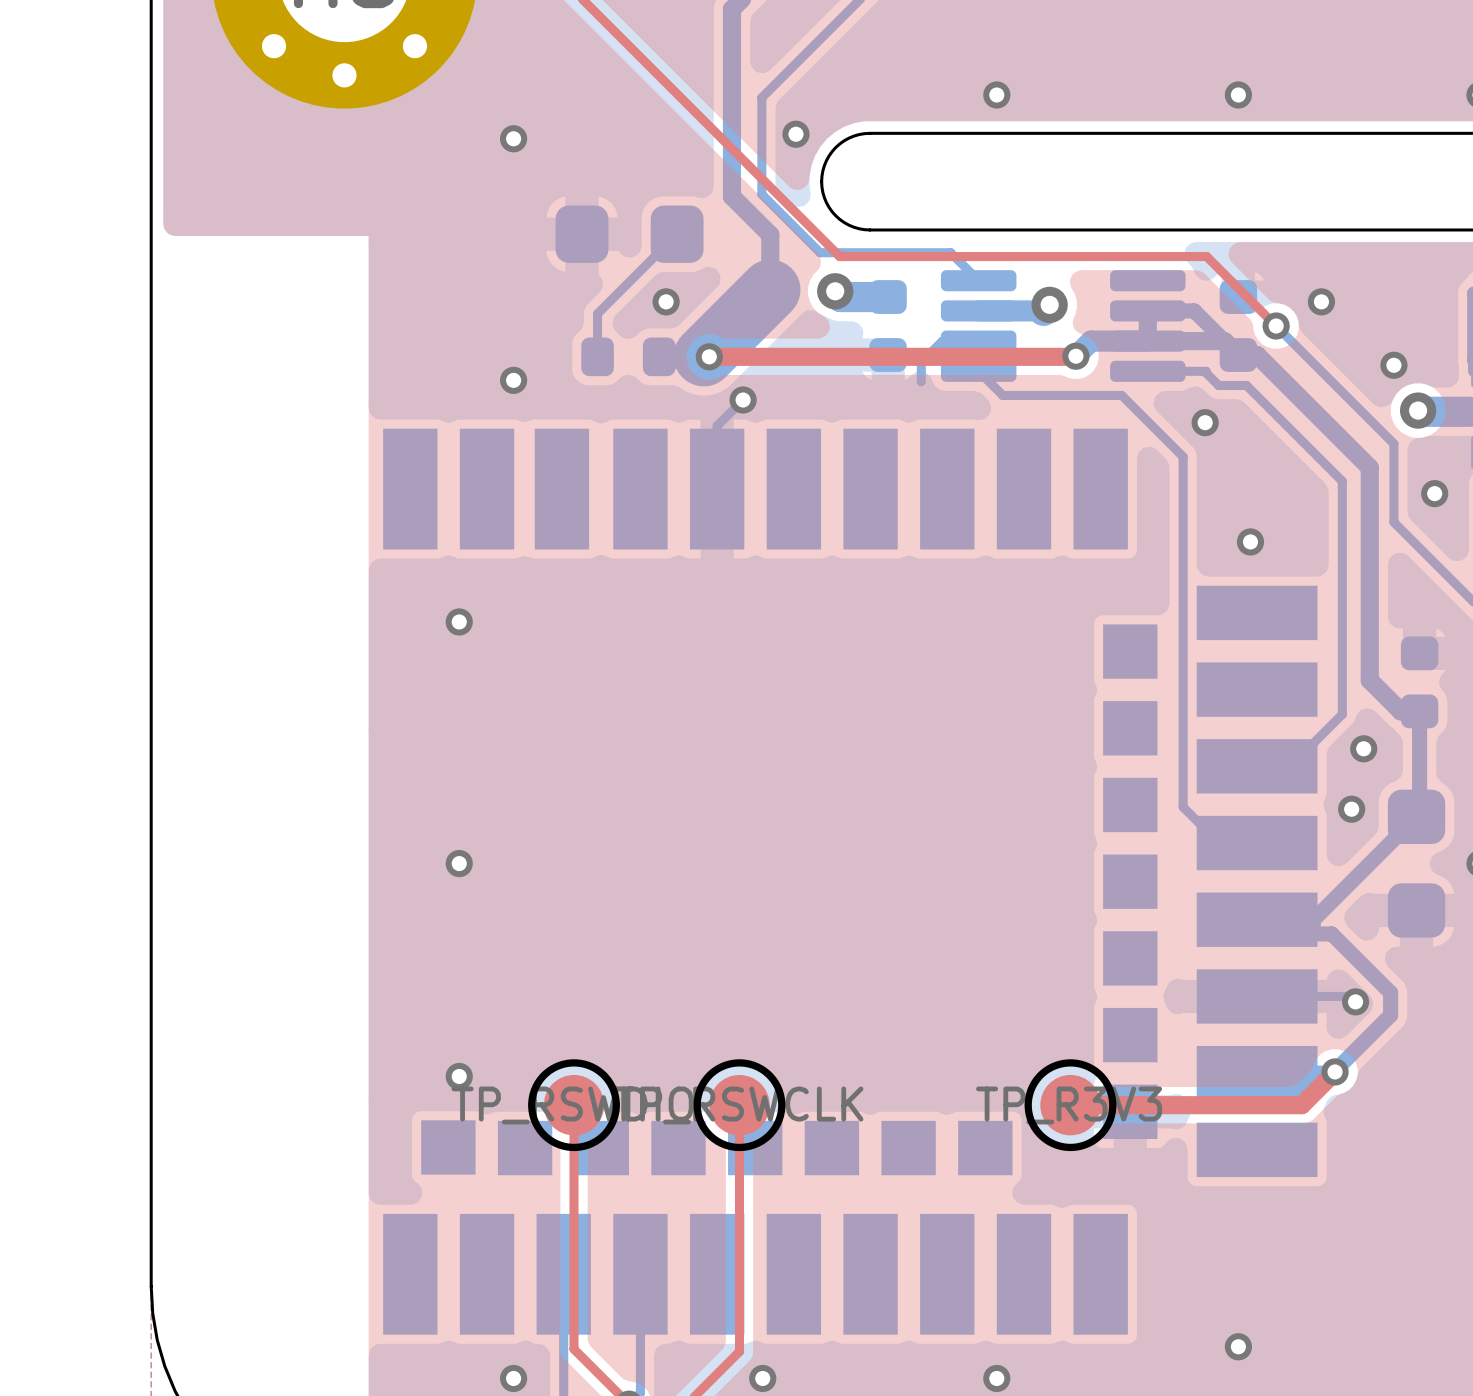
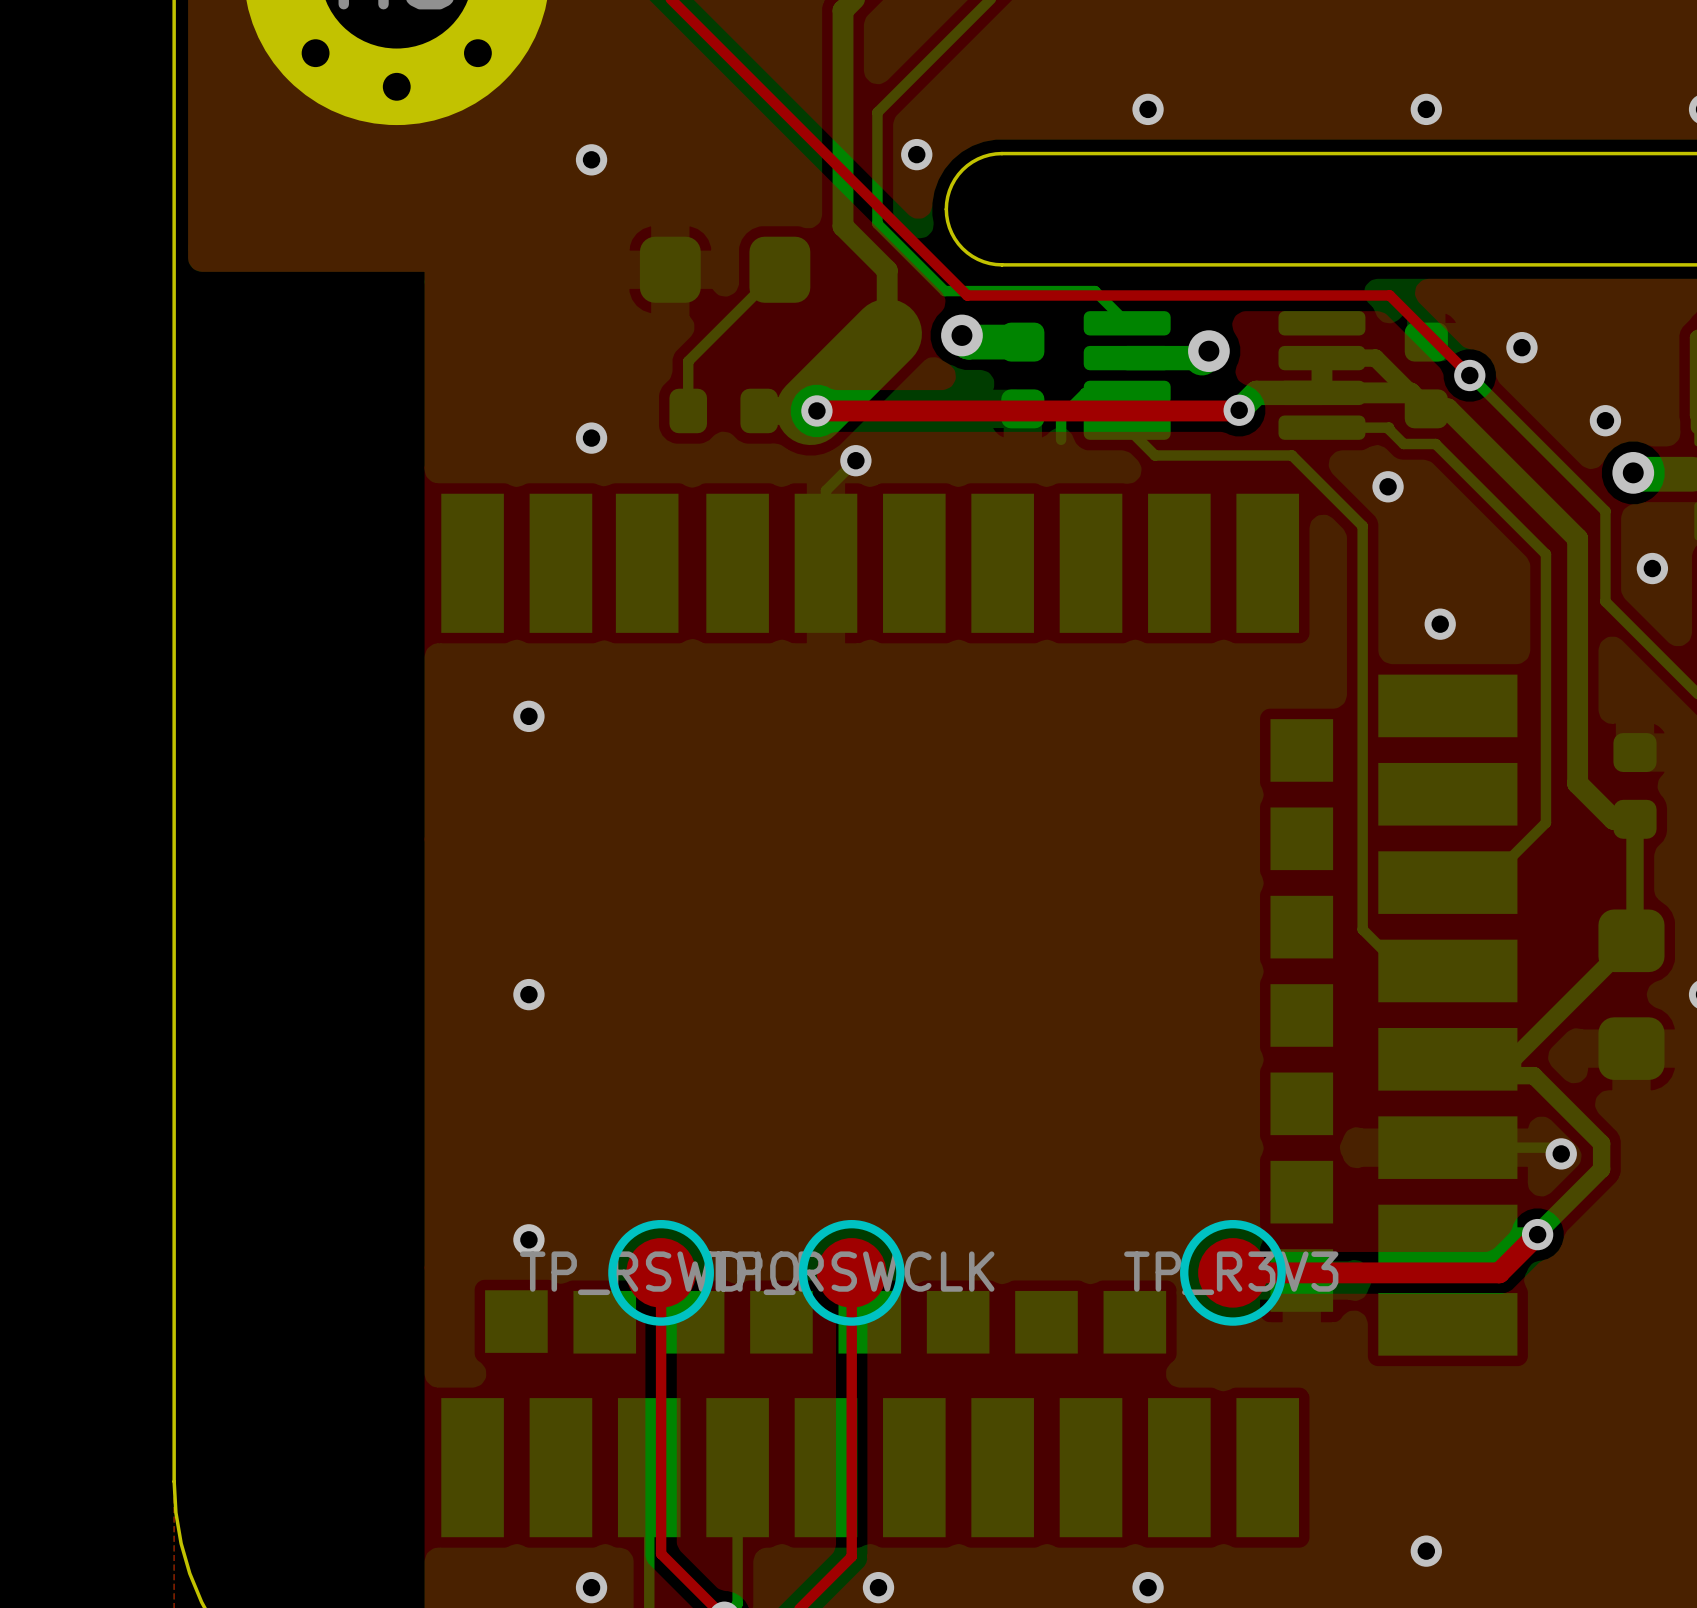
via: (666, 301) -> none
via: (1363, 748) -> none
via: (1351, 809) -> none

